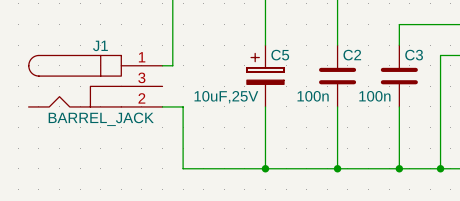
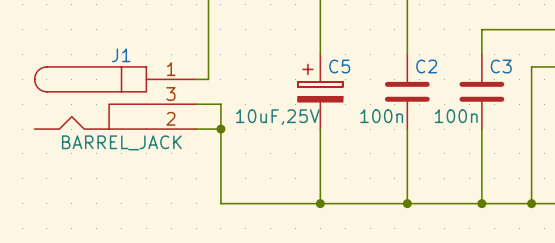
wire: none -> (196, 104) (220, 104) (220, 129)
junction: none -> (220, 129)

